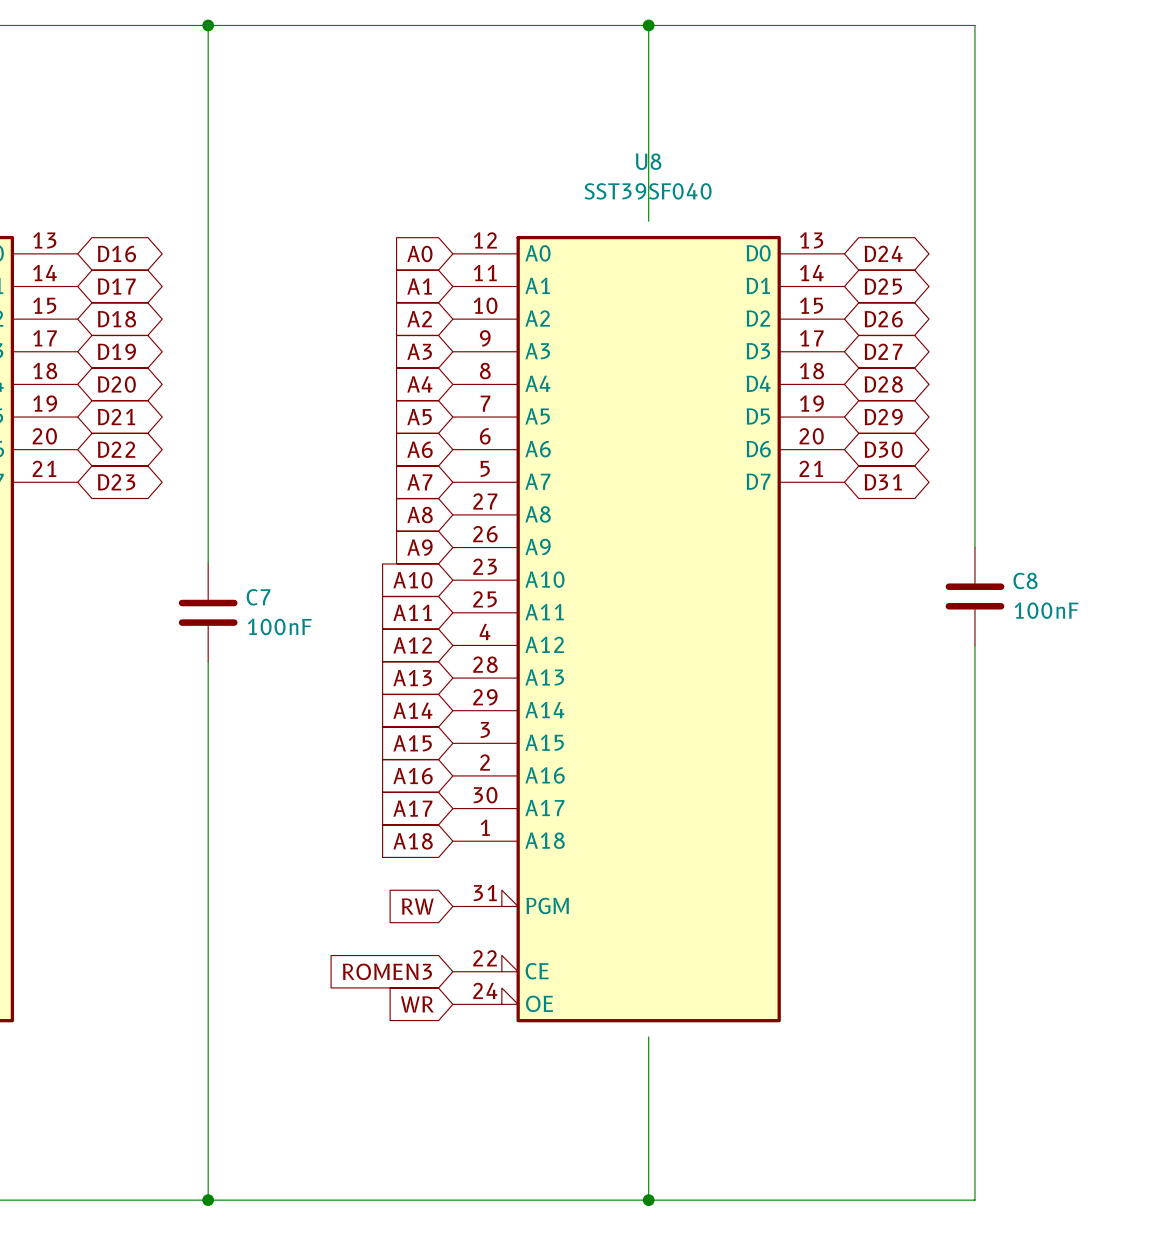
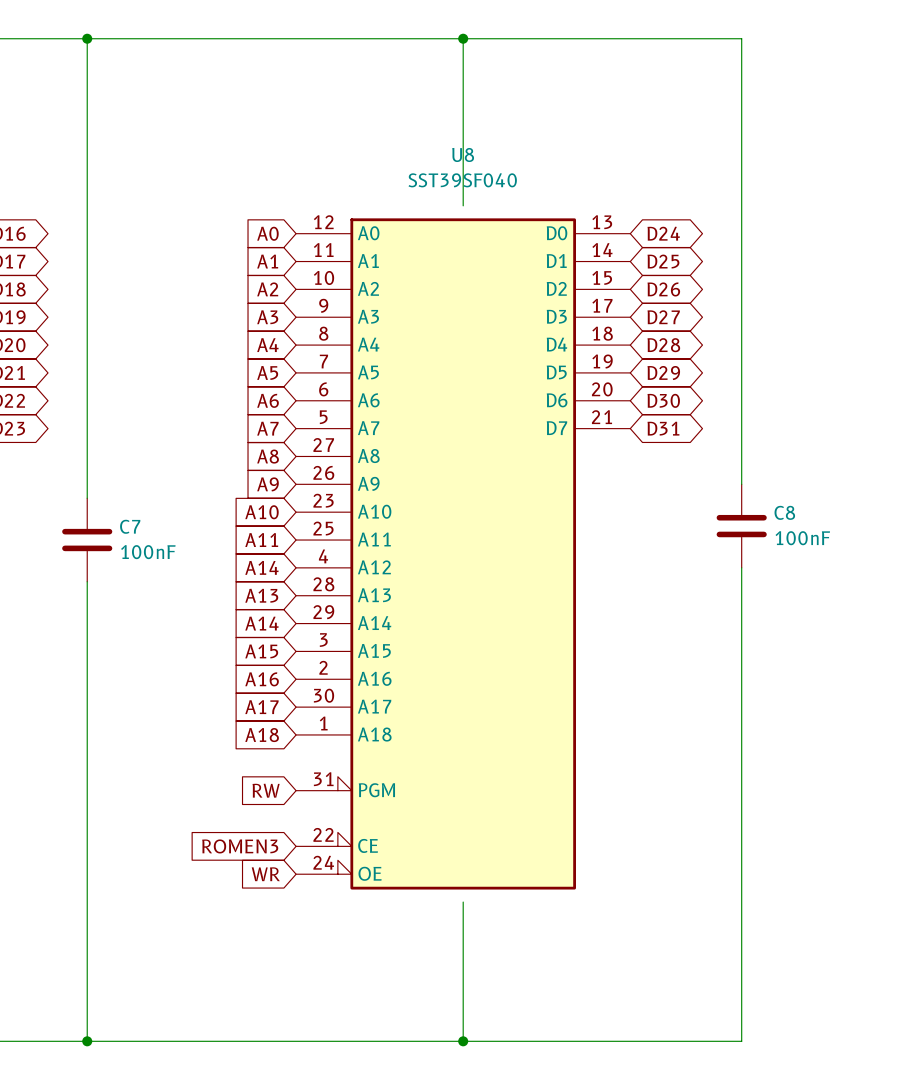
global label: A12 (412, 645) -> A14 (261, 567)

